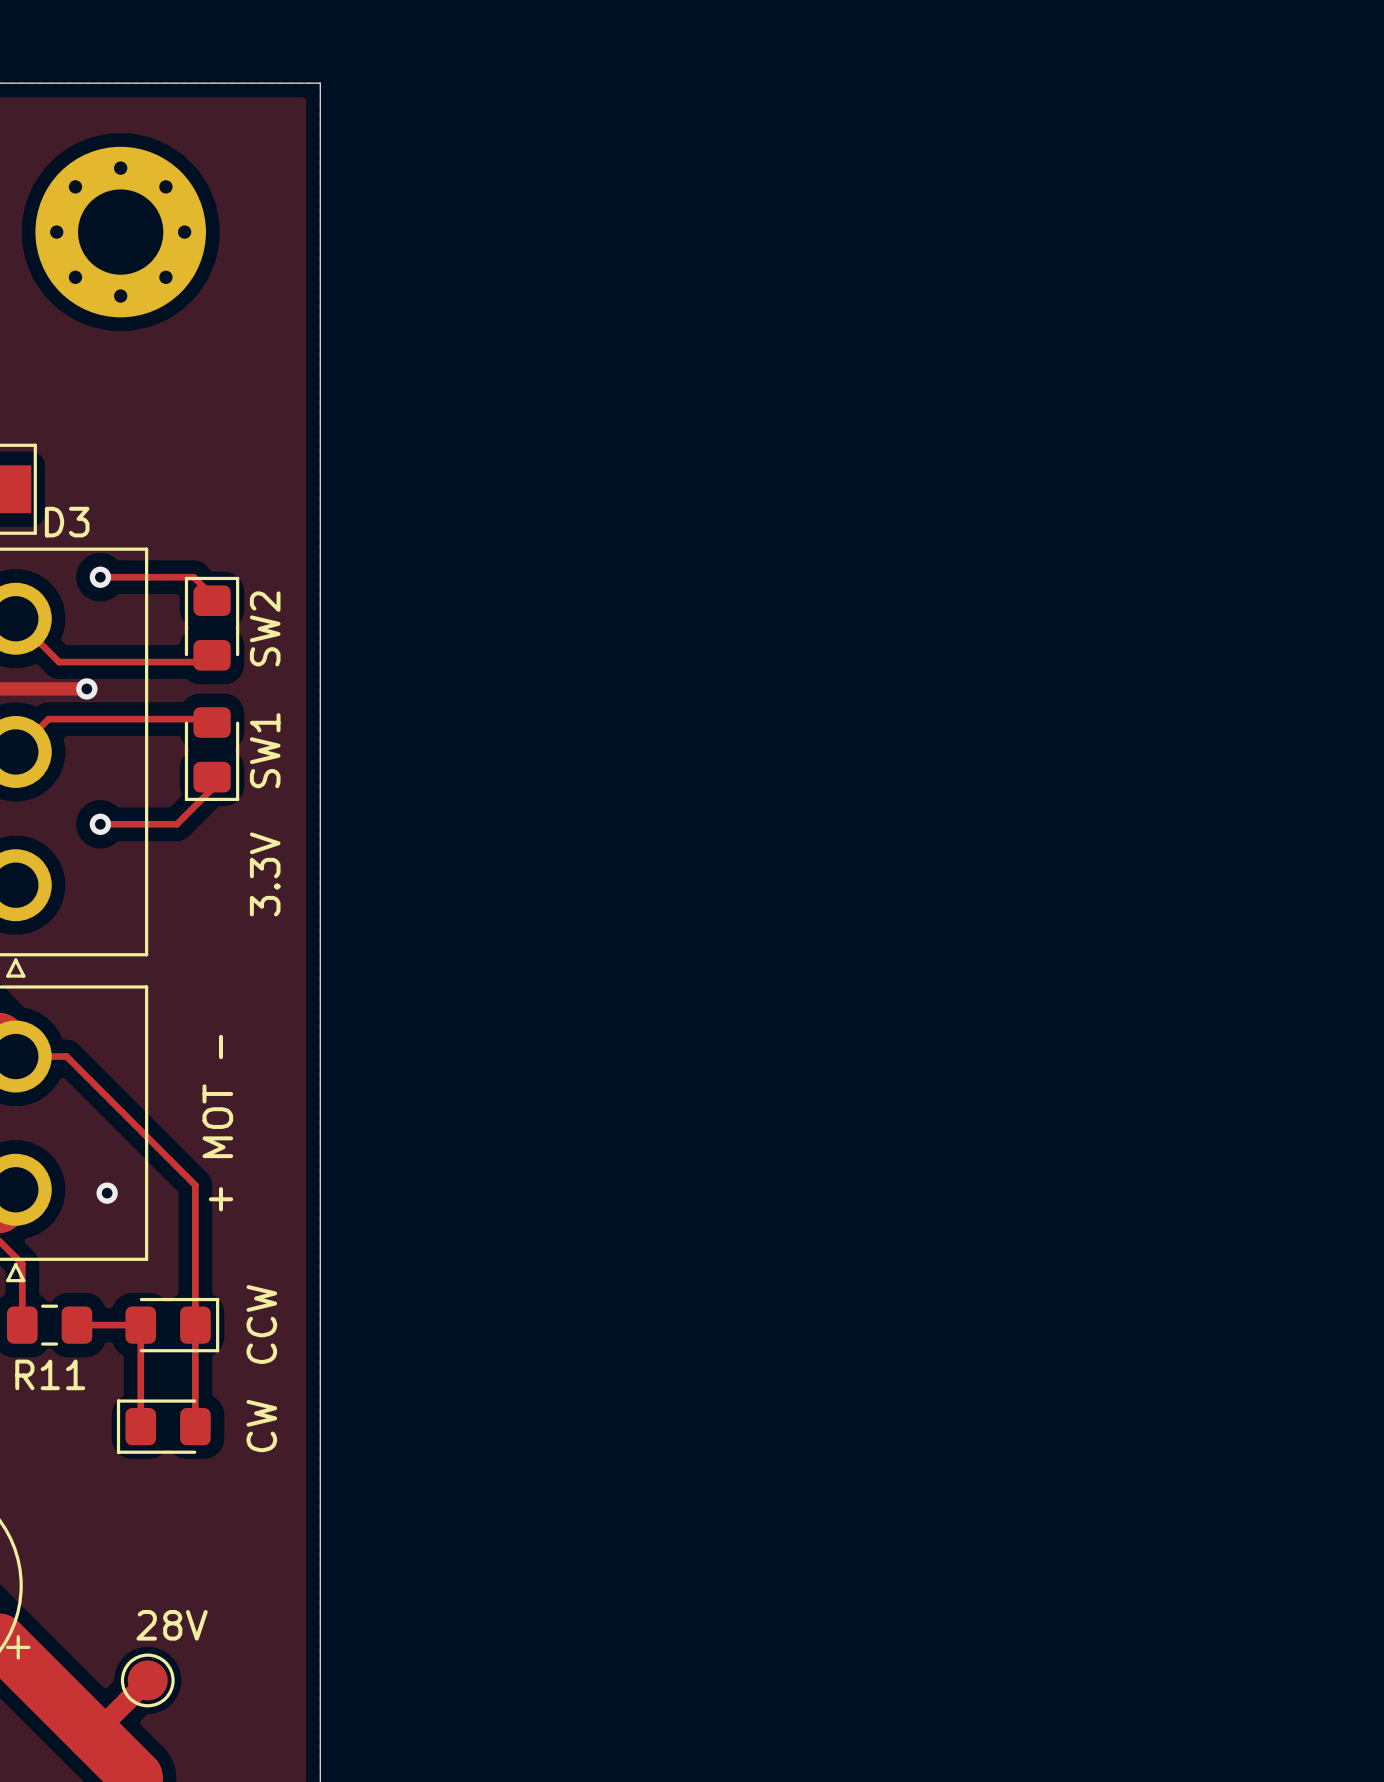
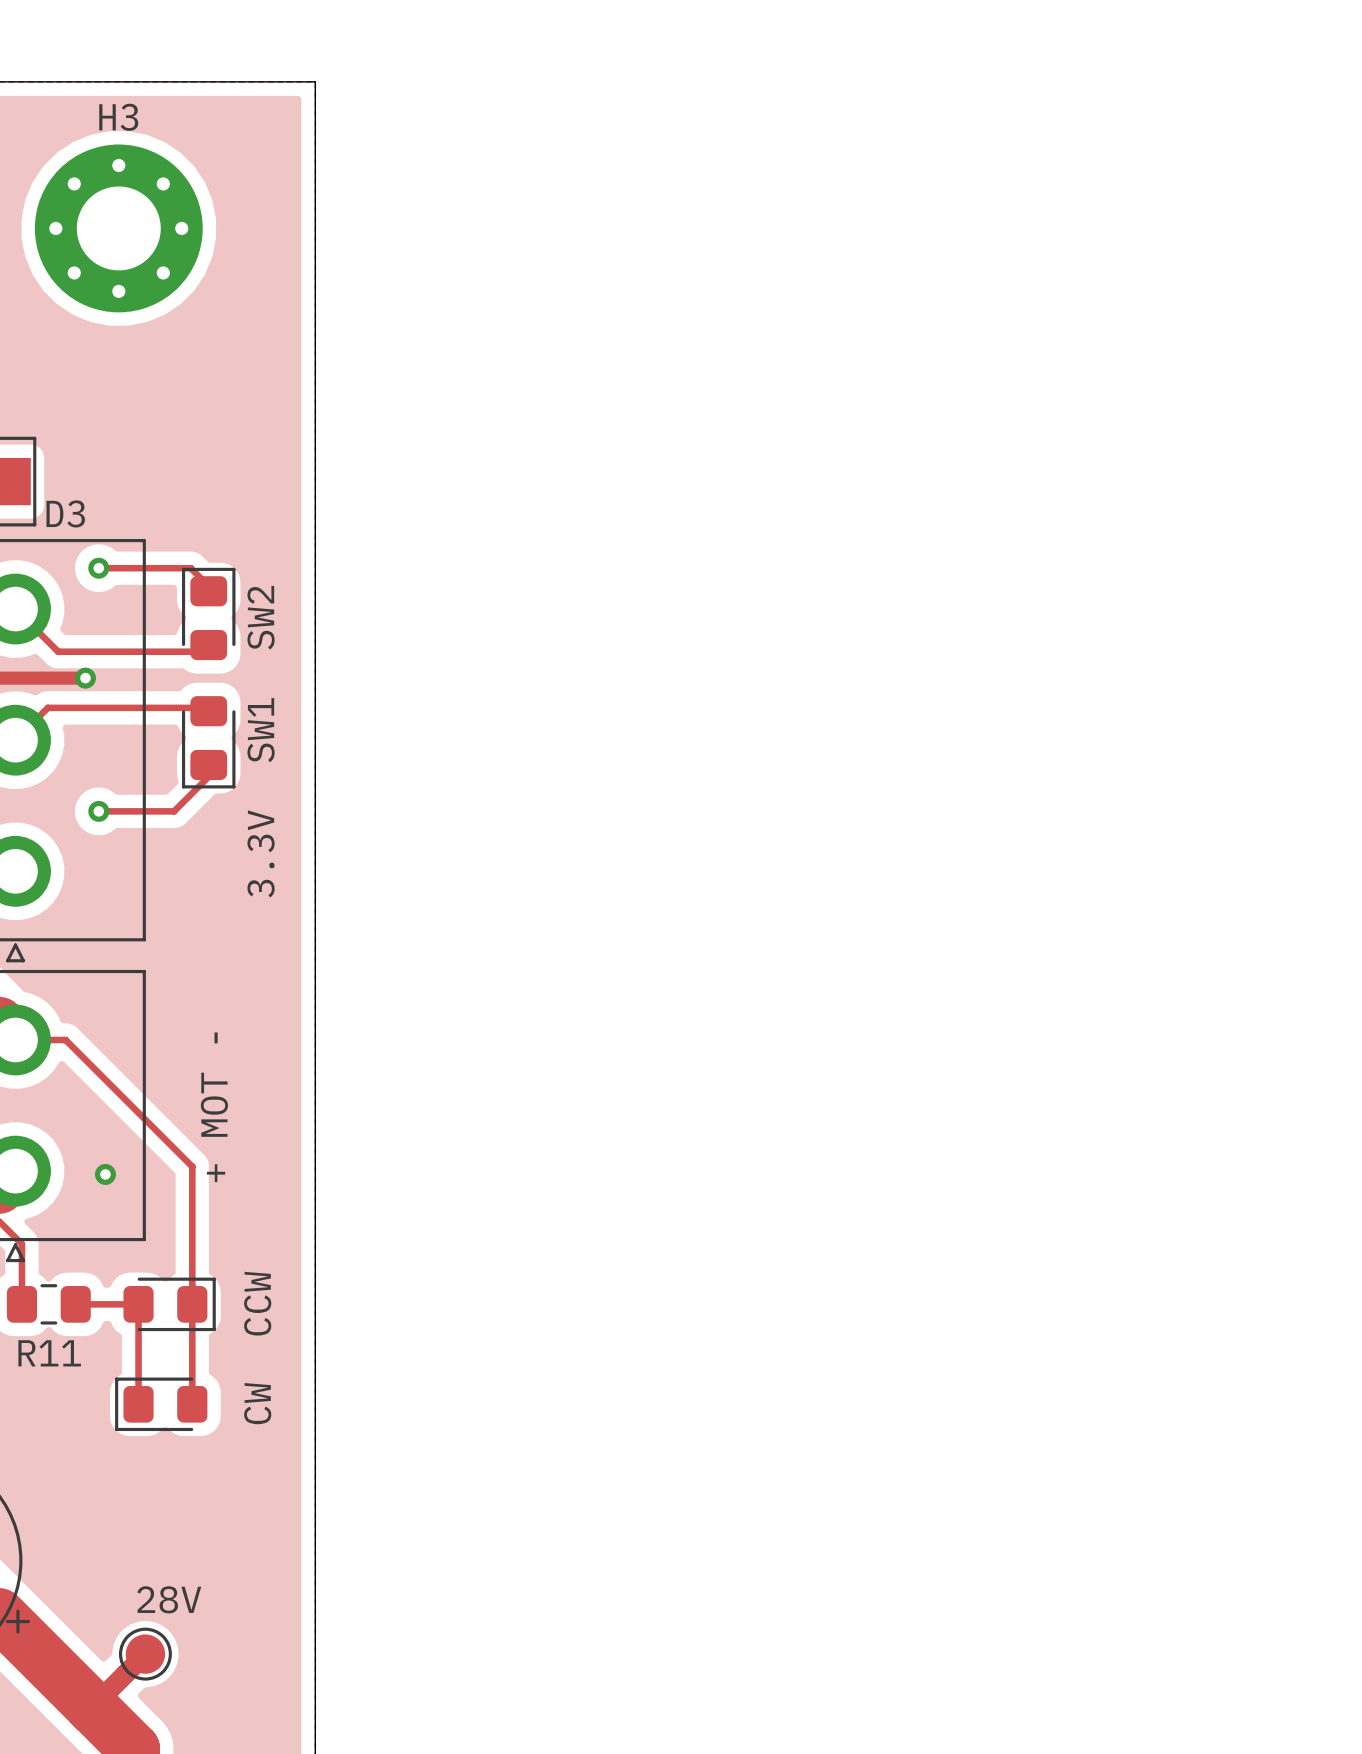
H3 name: none -> H3 (118, 117)

